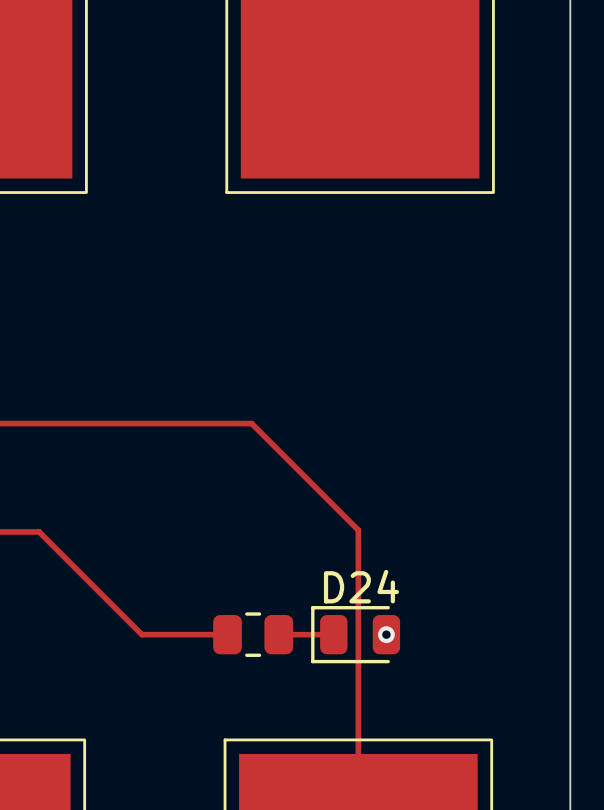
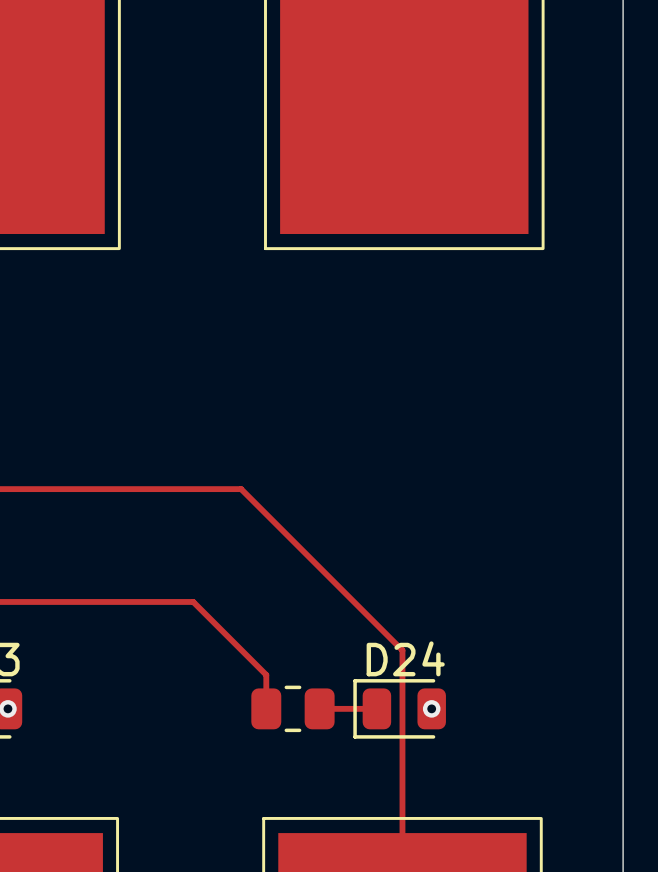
track: (203, 423) (251, 423) (358, 530) (358, 578) -> (241, 489) (402, 650)
track: (39, 531) (141, 634) (227, 634) -> (70, 601) (193, 601) (266, 674) (266, 708)

